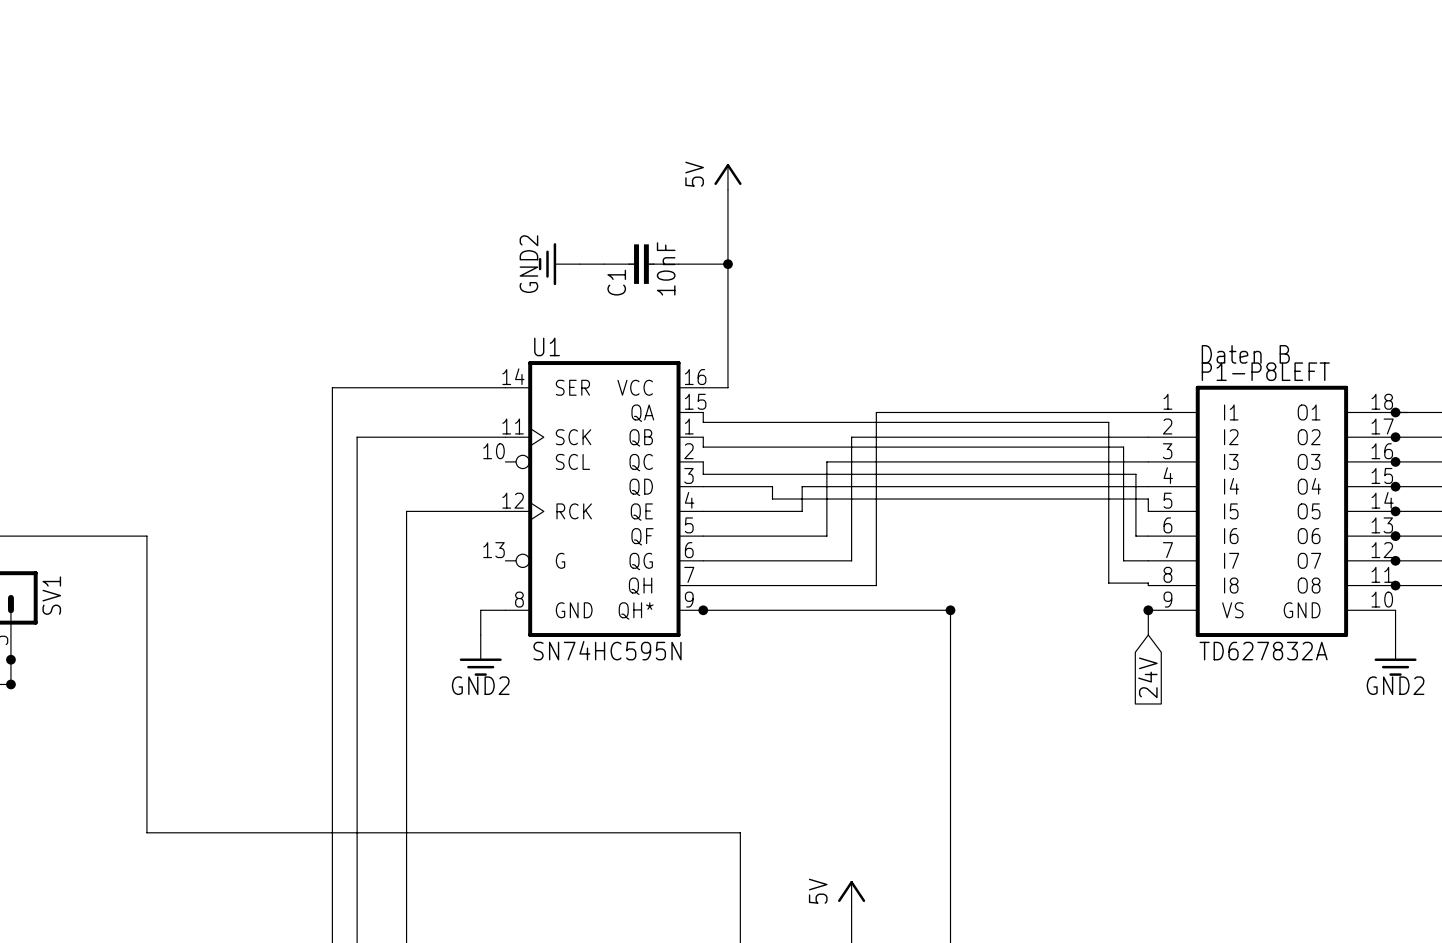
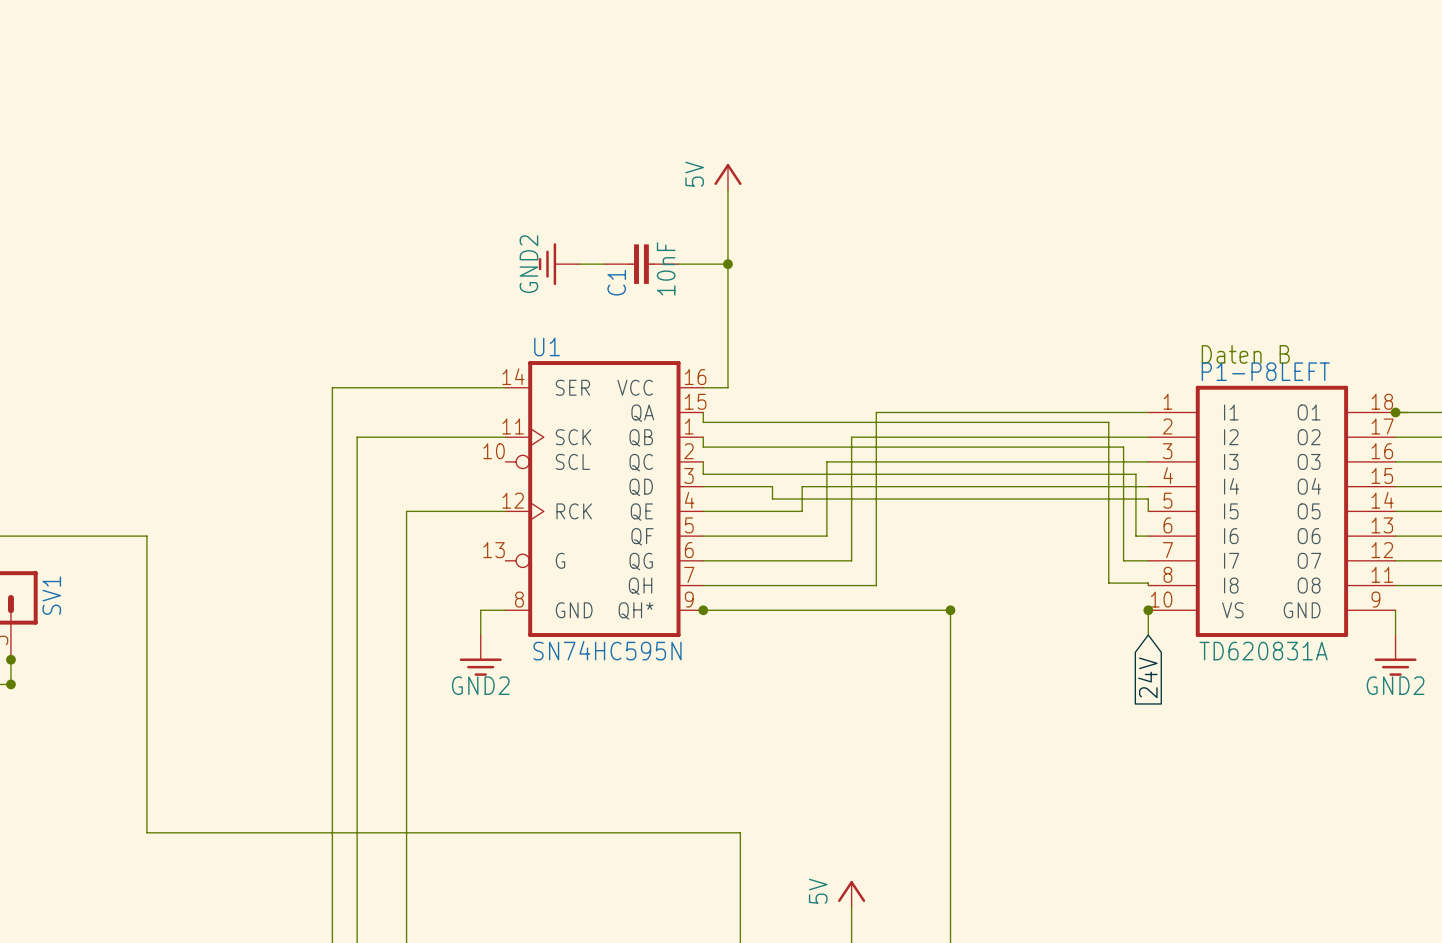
junction: (1395, 437) -> none
junction: (1395, 461) -> none
junction: (1395, 486) -> none
junction: (1395, 511) -> none
junction: (1395, 536) -> none
junction: (1395, 560) -> none
junction: (1395, 585) -> none
P1-P8LEFT pin number: 9 (1167, 599) -> 10 (1161, 599)
P1-P8LEFT pin number: 10 (1382, 599) -> 9 (1375, 599)
P1-P8LEFT value: TD627832A (1263, 651) -> TD620831A (1263, 651)

